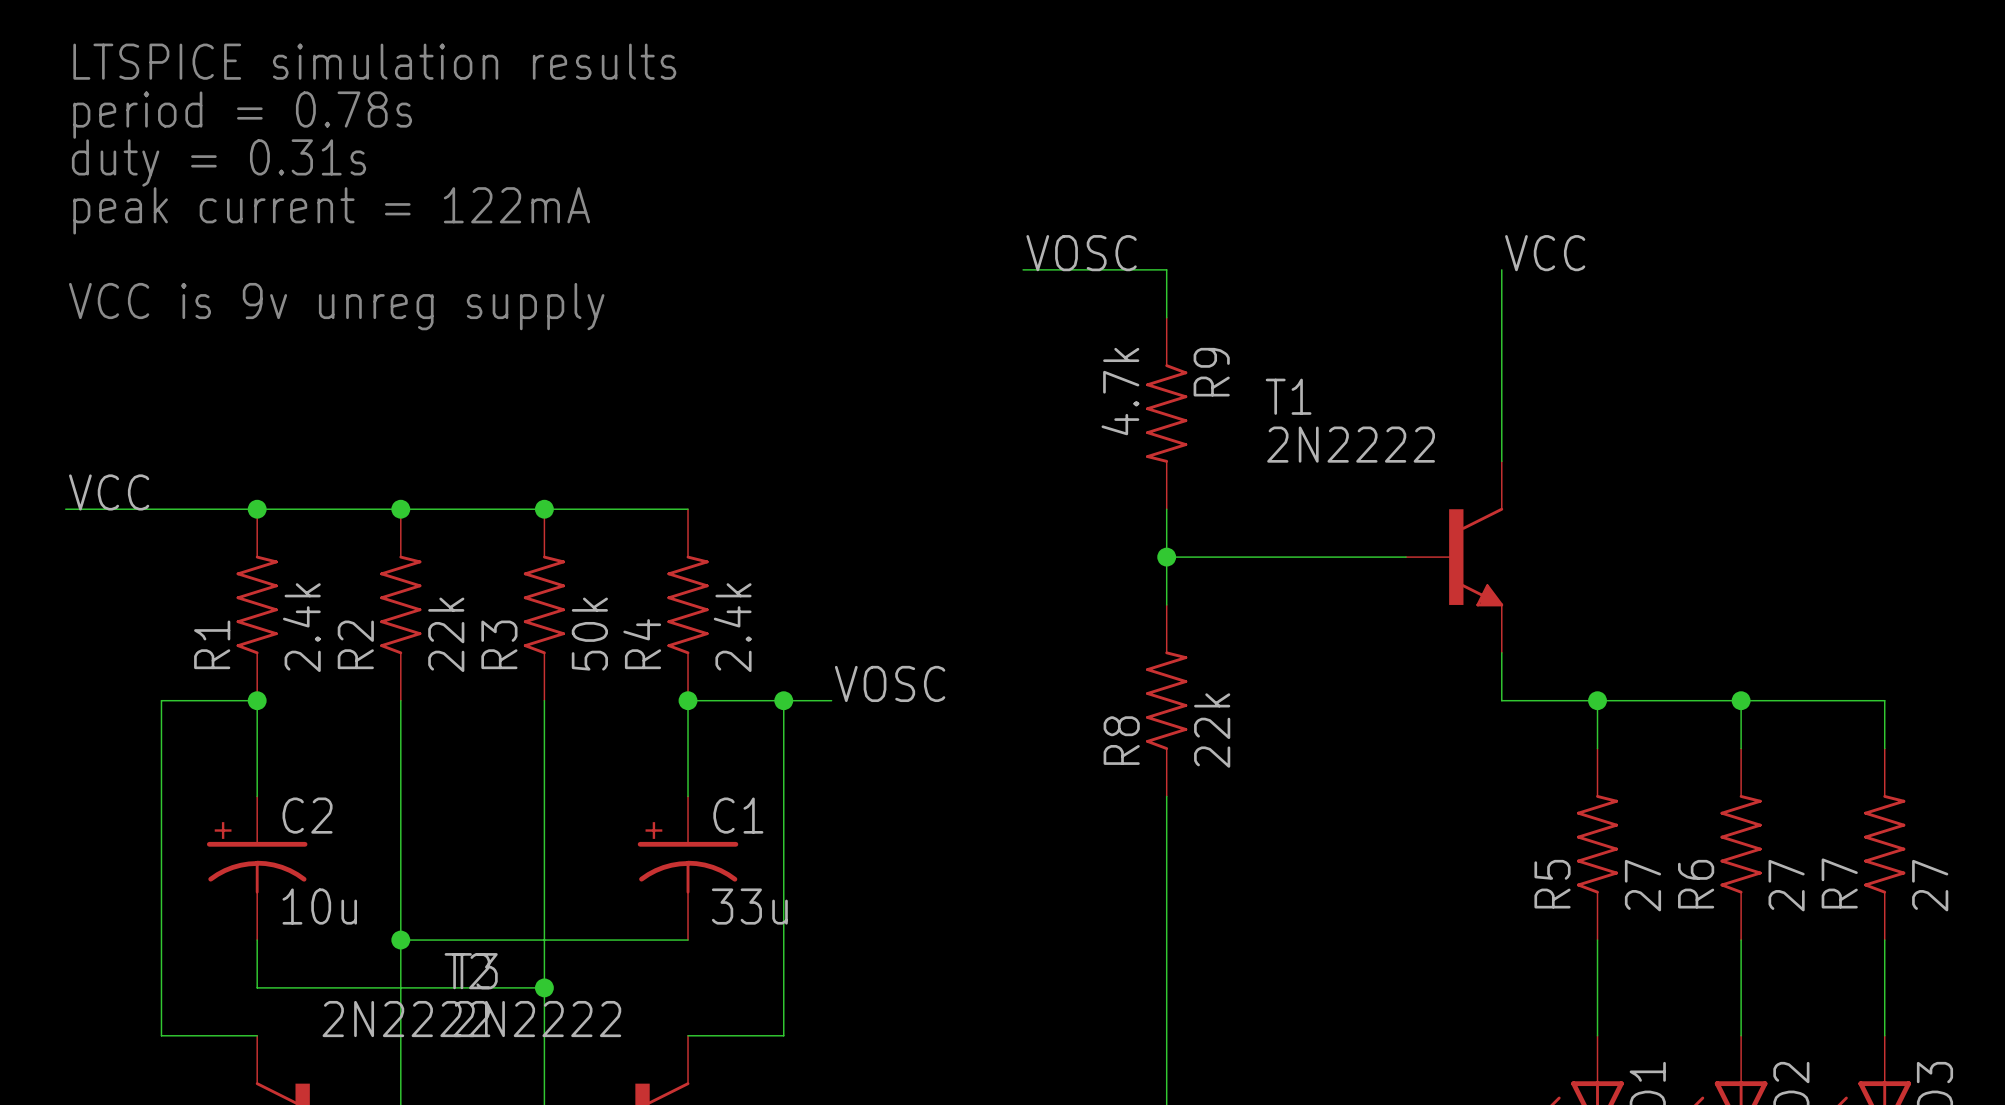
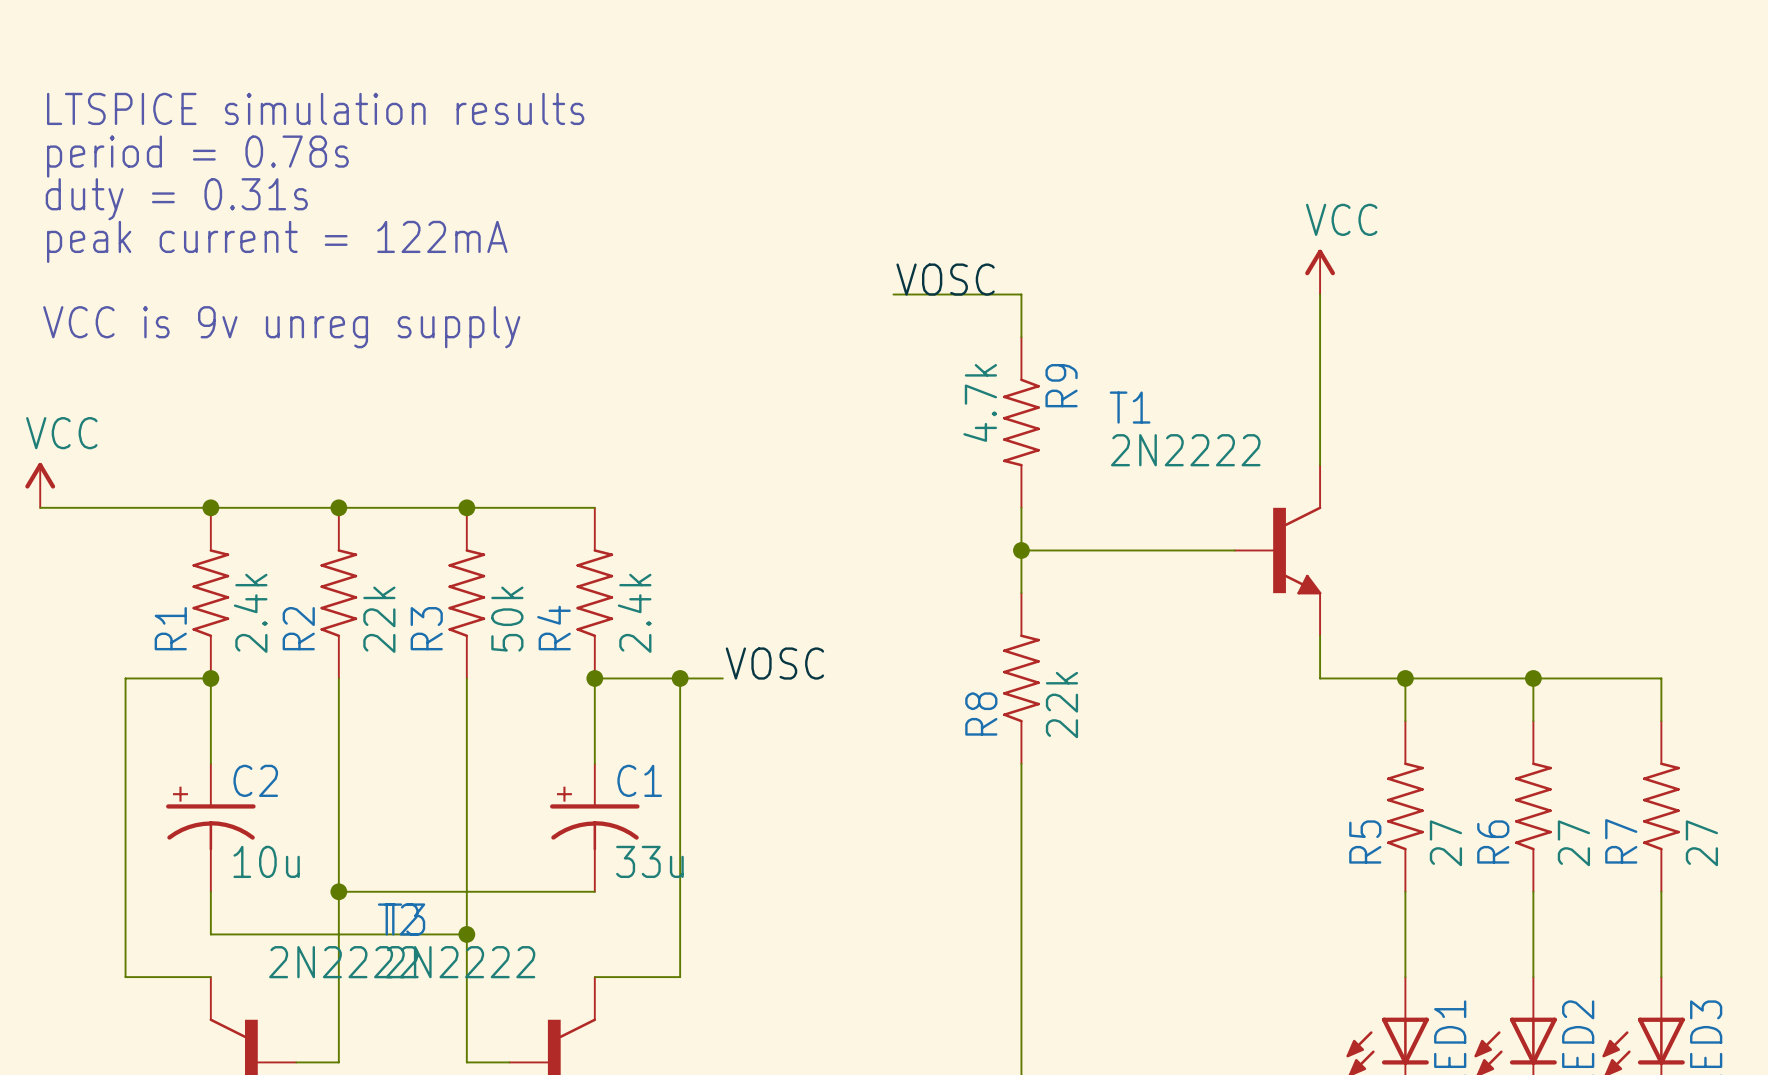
power symbol: none -> VCC (1320, 272)
label: VCC (1545, 253) -> none
power symbol: none -> VCC (40, 485)
label: VCC (109, 492) -> none

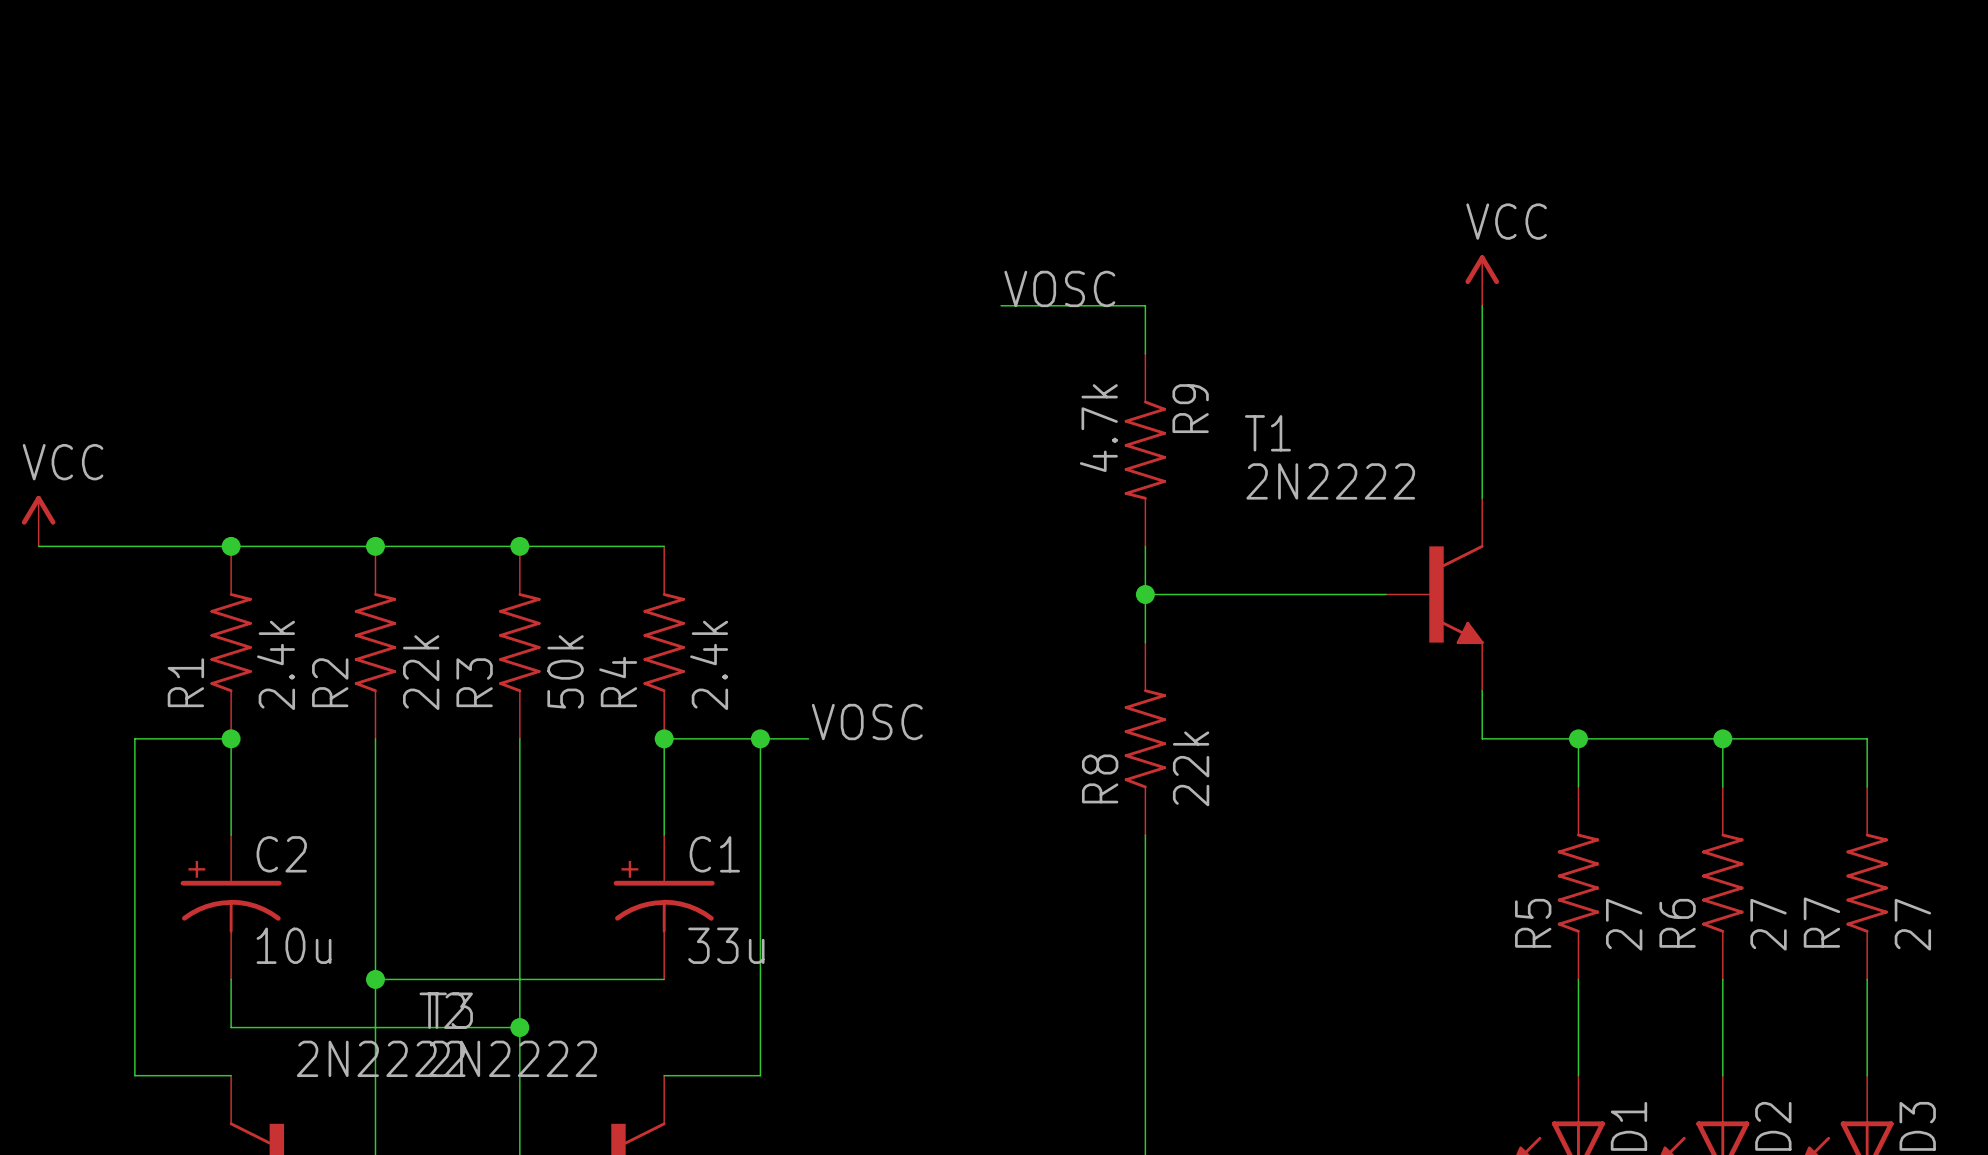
text: LTSPICE simulation results (315, 108) -> none
text: period = 0.78s (197, 156) -> none
text: duty = 0.31s (176, 199) -> none
text: peak current = 122mA (277, 241) -> none
text: VCC is 9v unreg supply (281, 327) -> none

